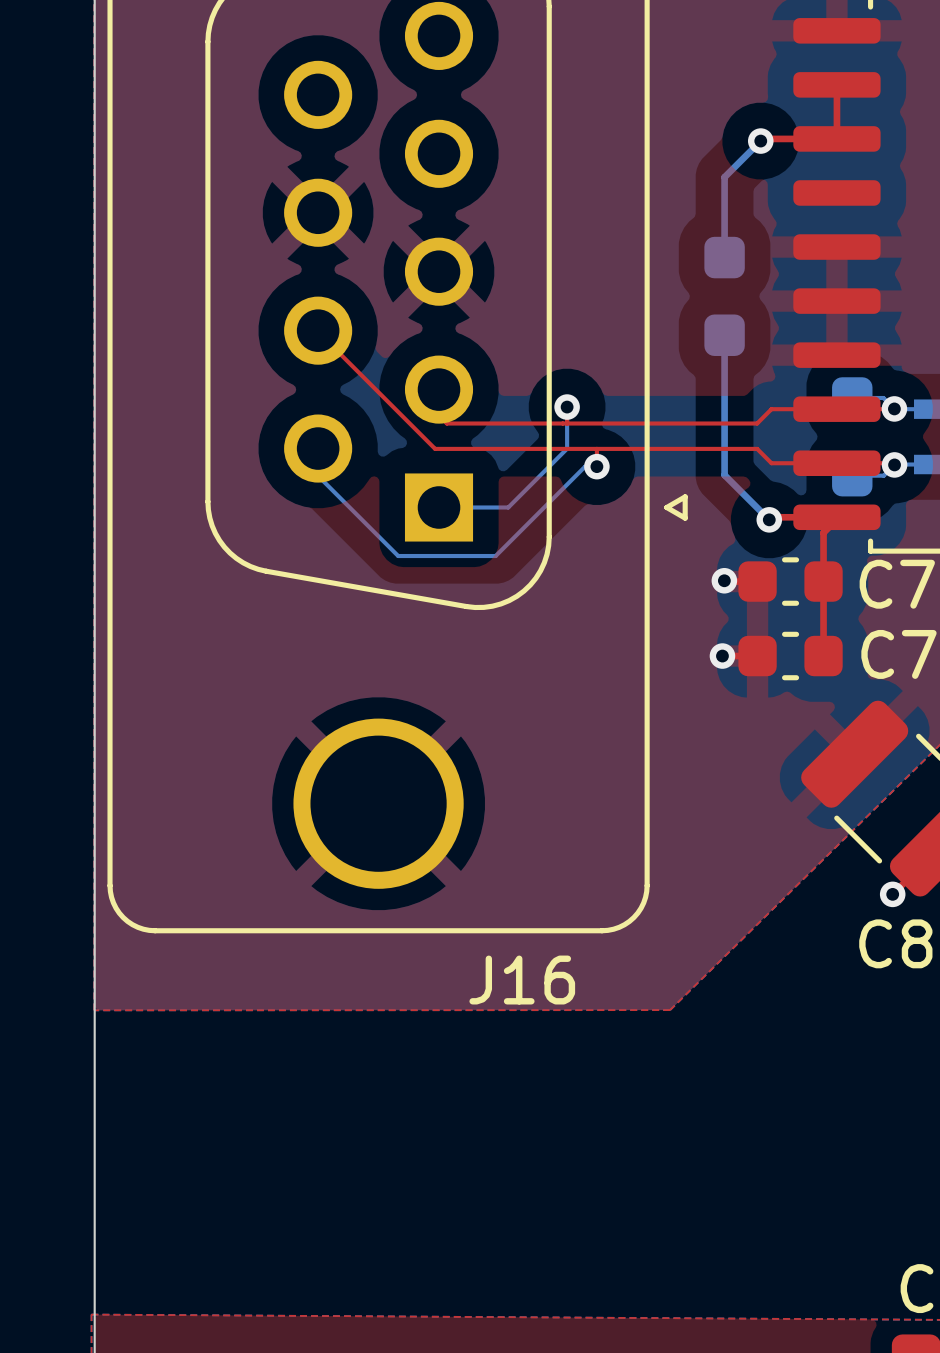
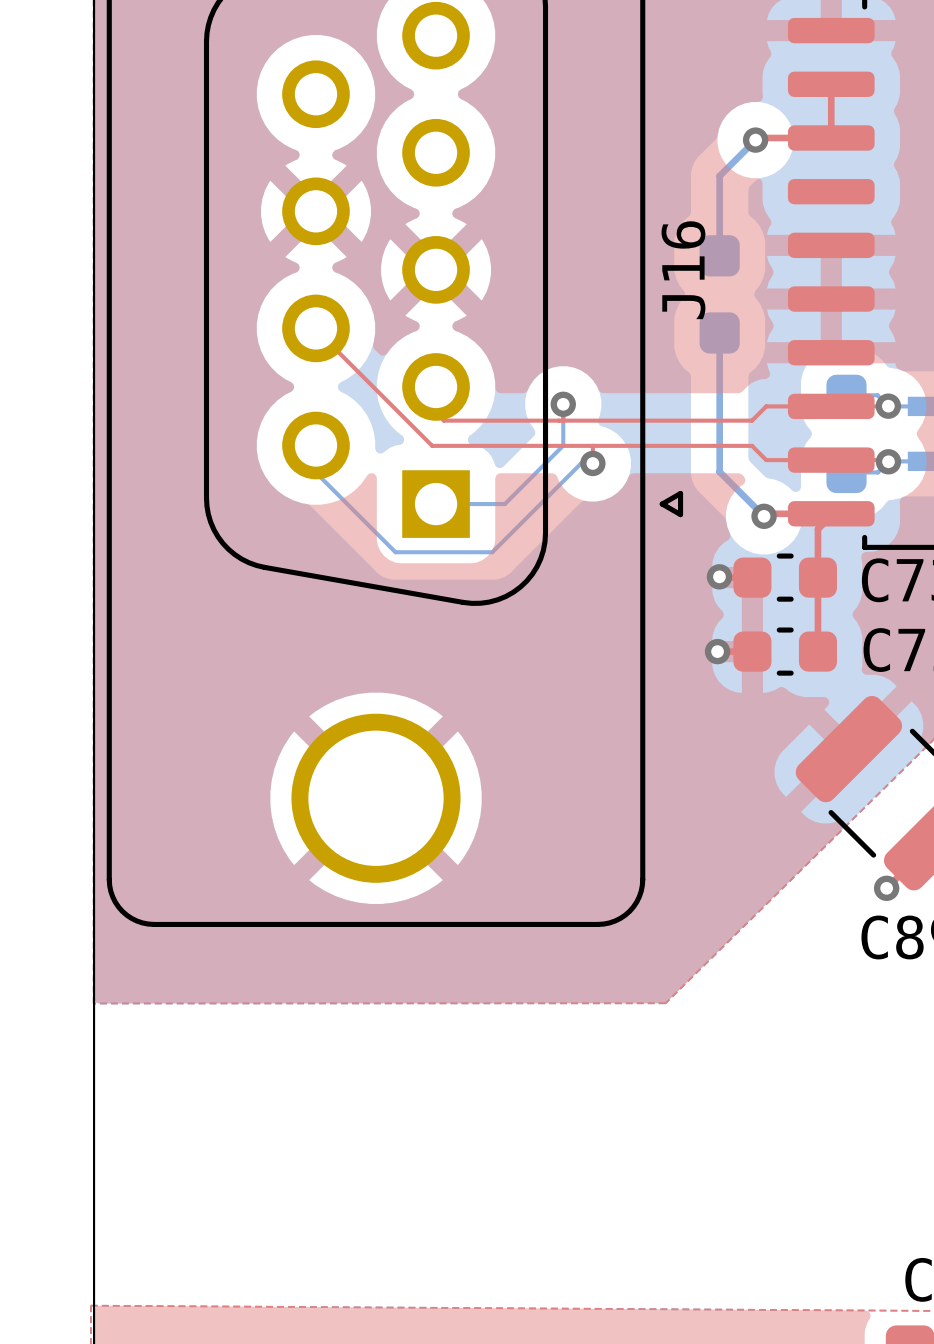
J16 name rotation: 0° (522, 980) -> 90° counterclockwise (683, 270)
J16 name position: J16 (522, 980) -> J16 (683, 270)

